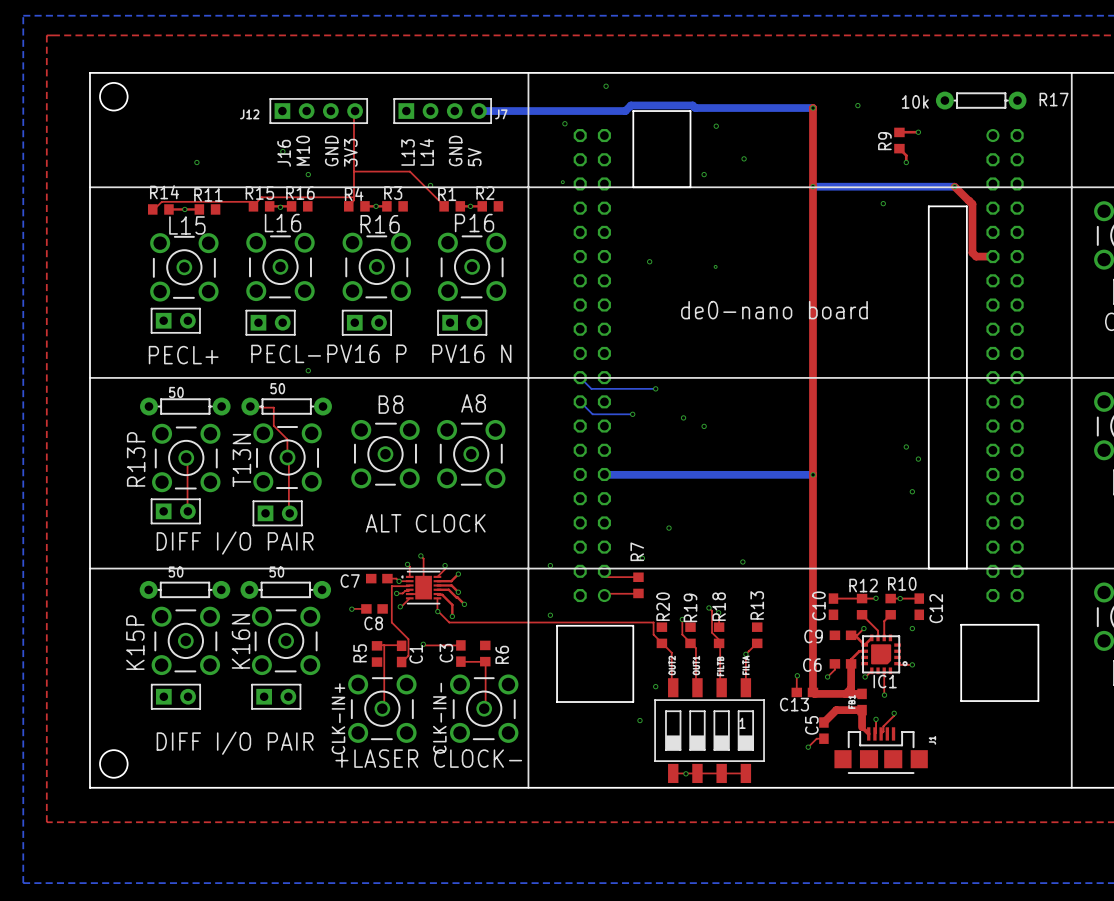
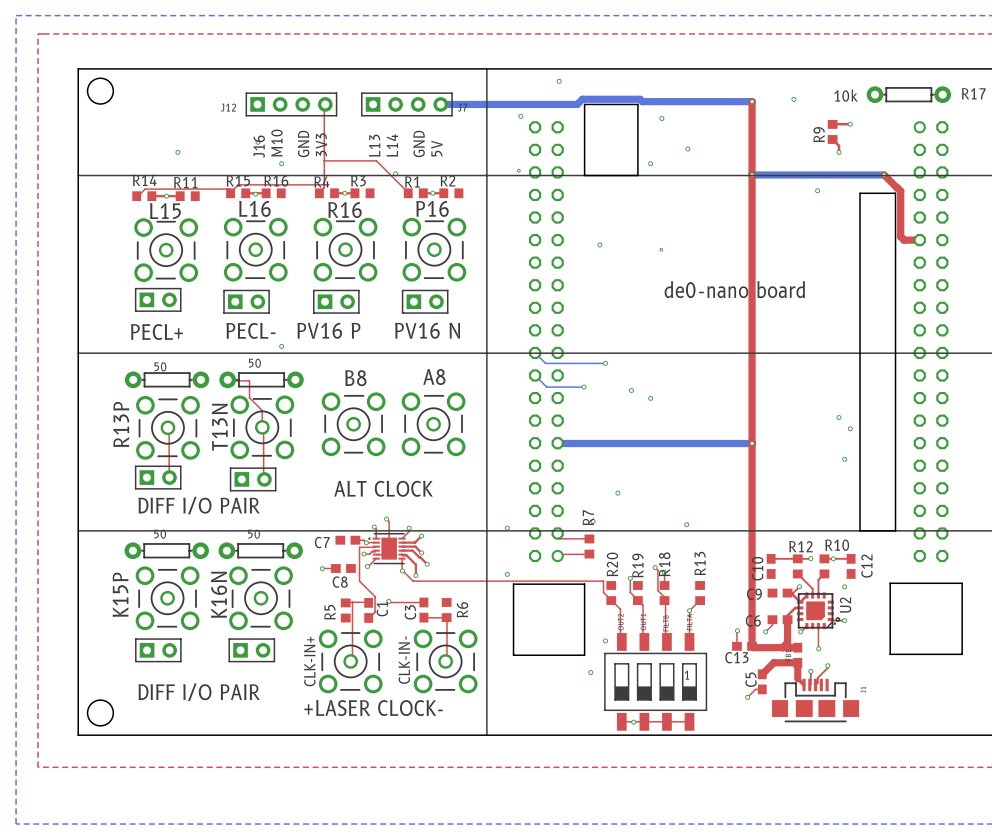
IC1: (881, 654) -> none
U2: none -> (816, 610)

